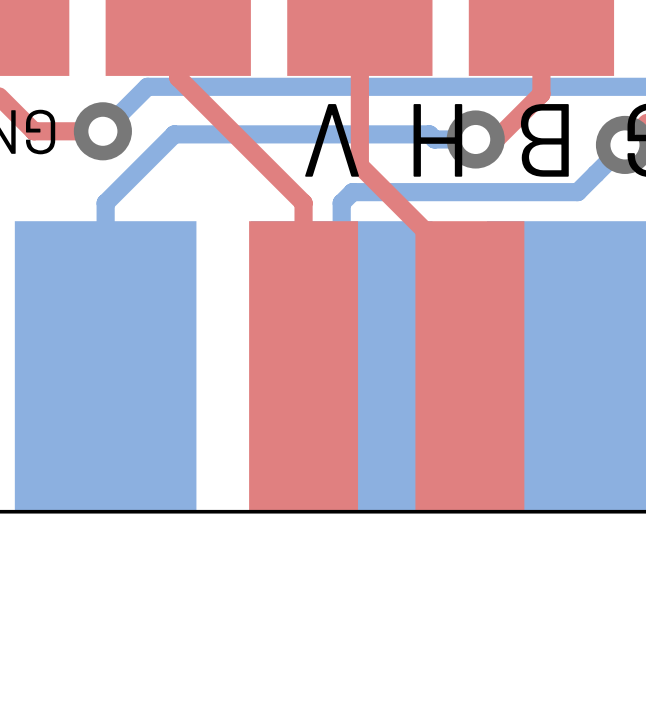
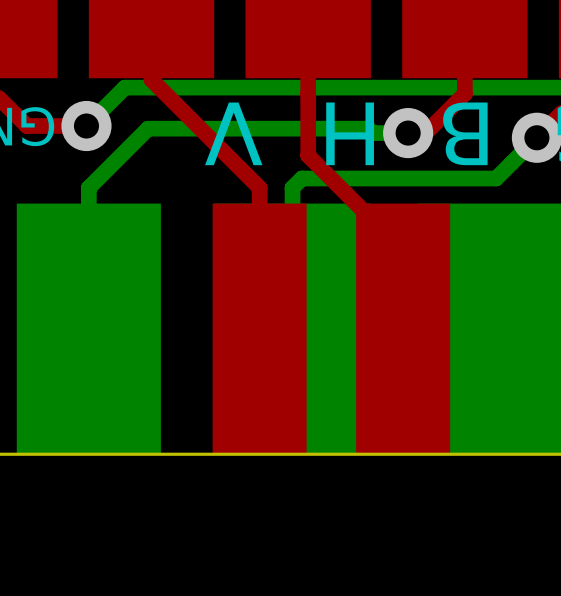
part footprint: [14, 221, 197, 512] -> [16, 203, 161, 455]

